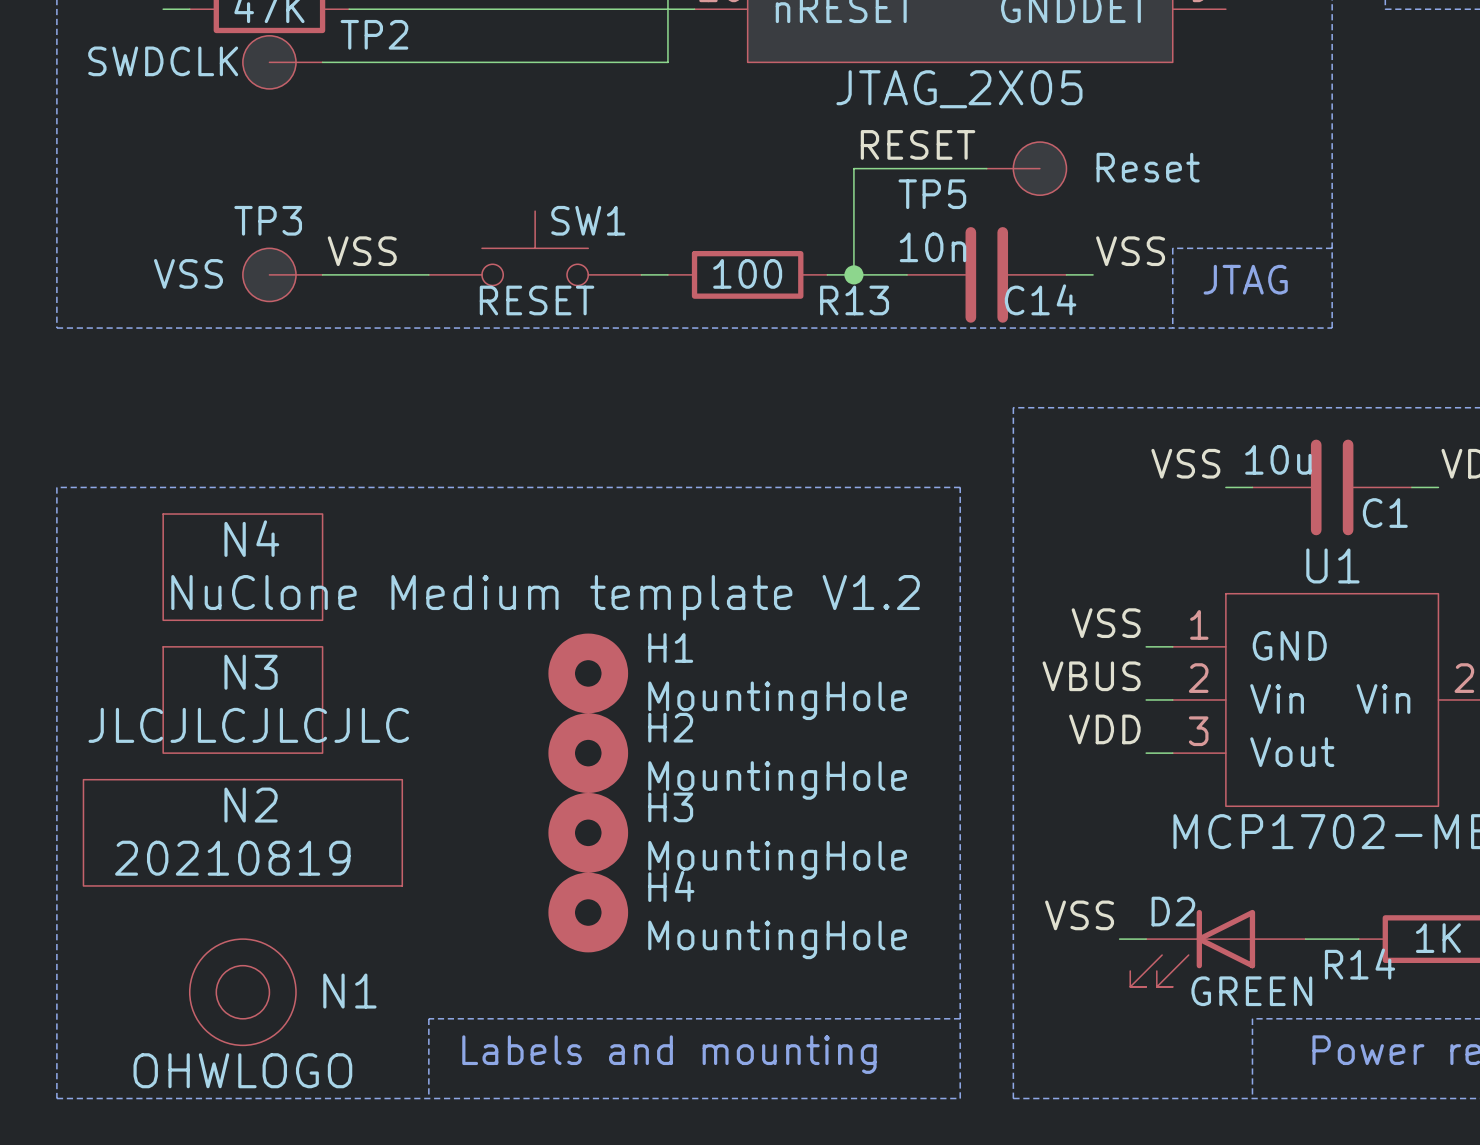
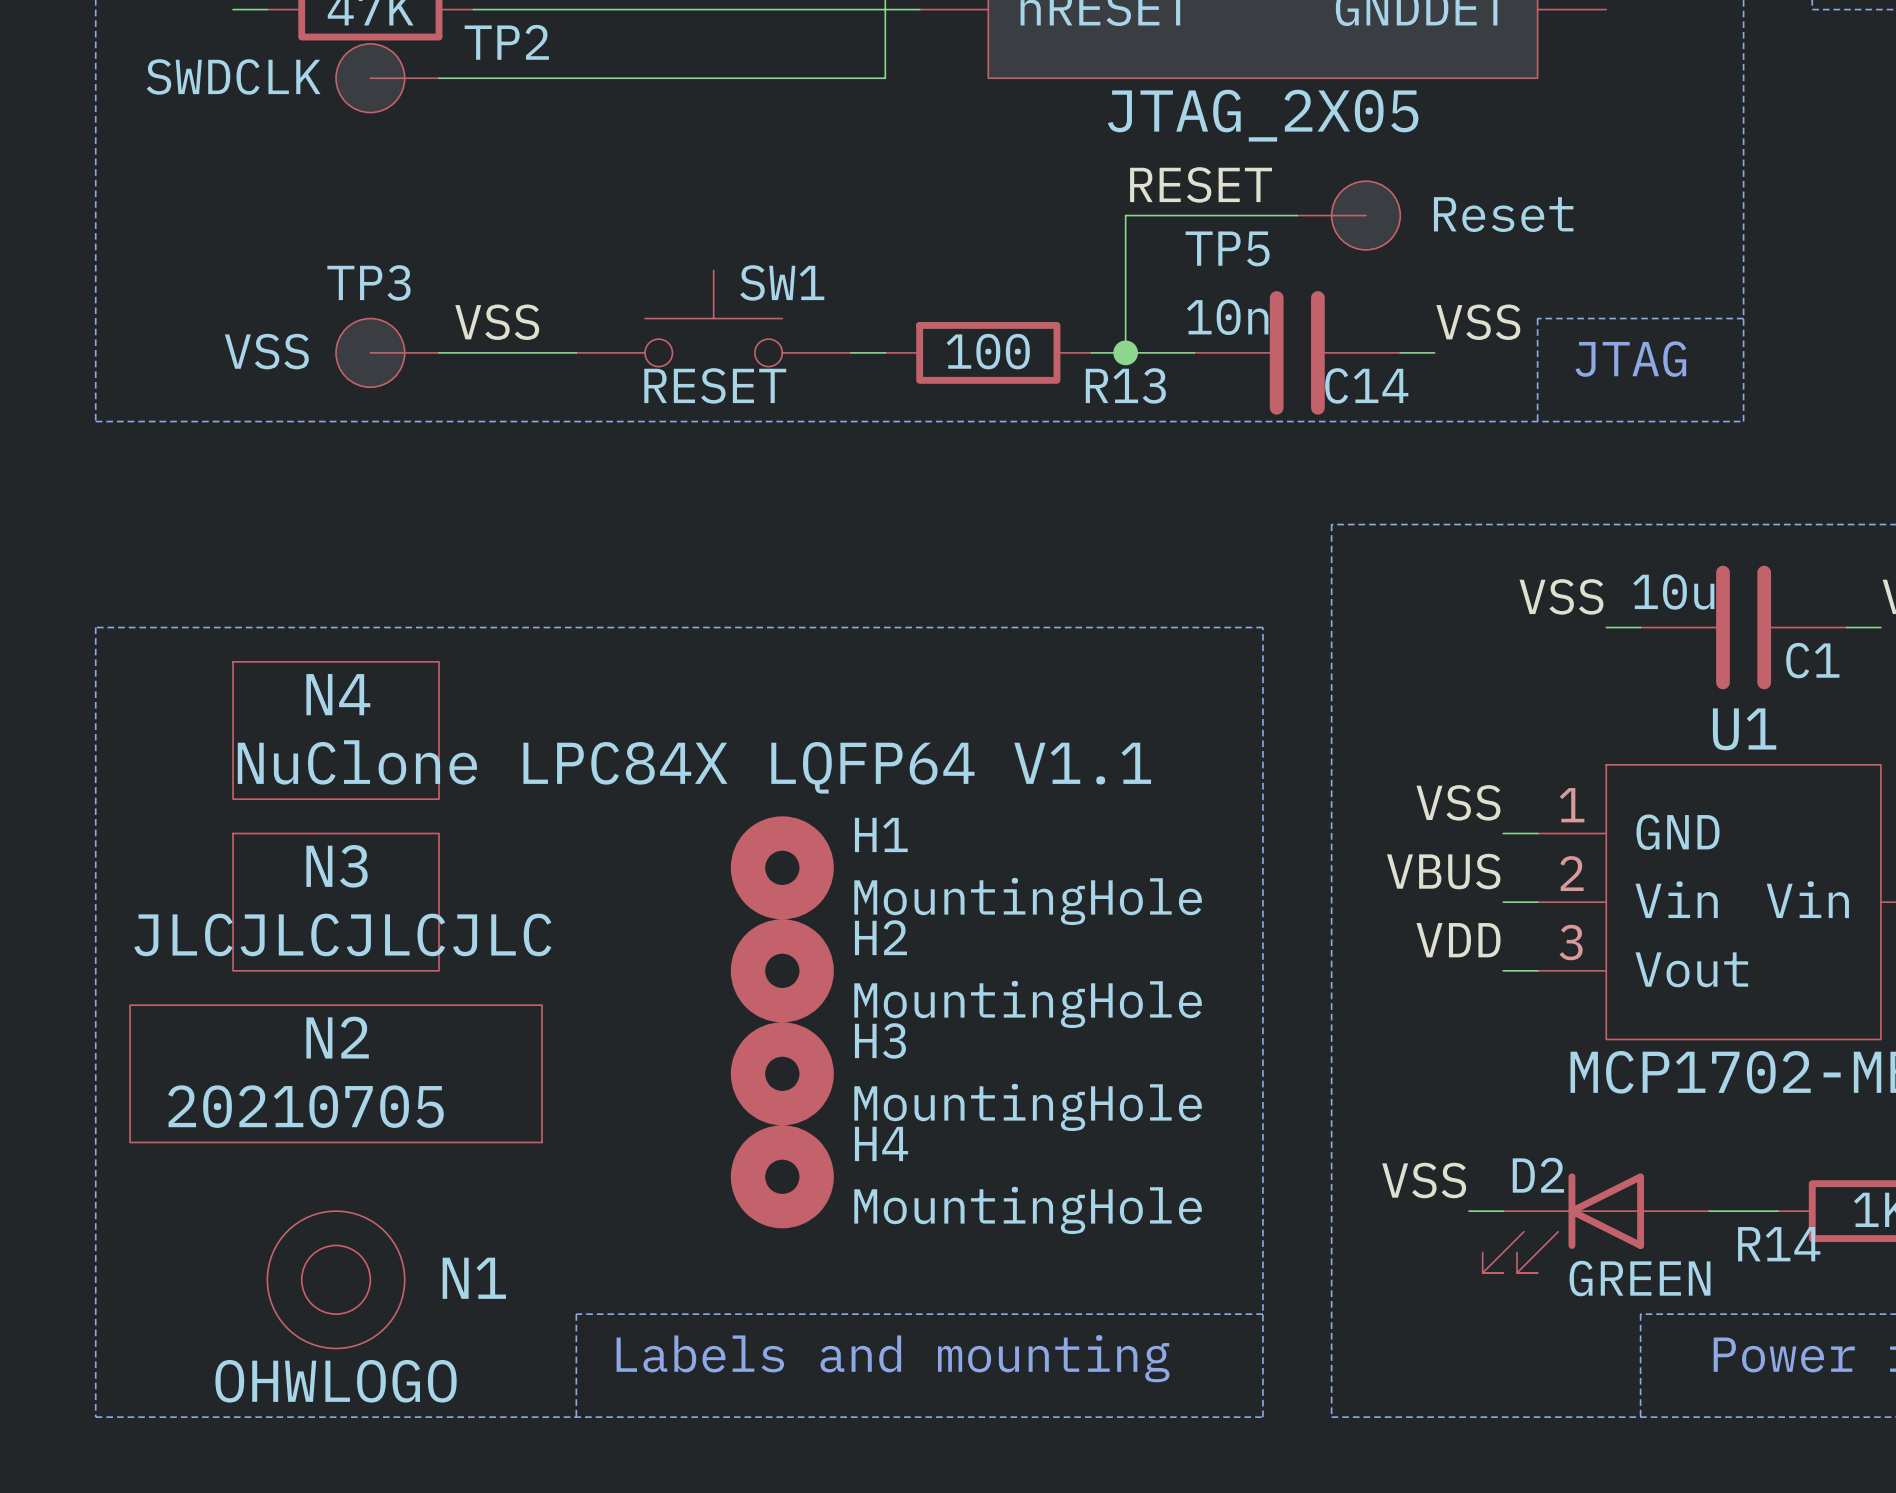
N4 value: NuClone Medium template V1.2 (545, 597) -> NuClone LPC84X LQFP64 V1.1 (694, 766)
N2 value: 20210819 (232, 858) -> 20210705 (305, 1106)

